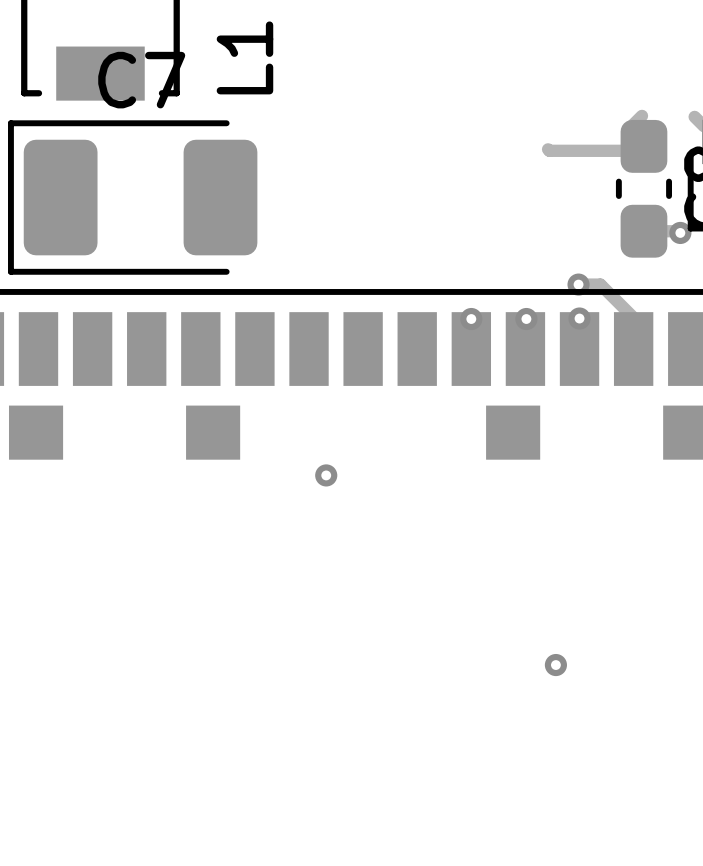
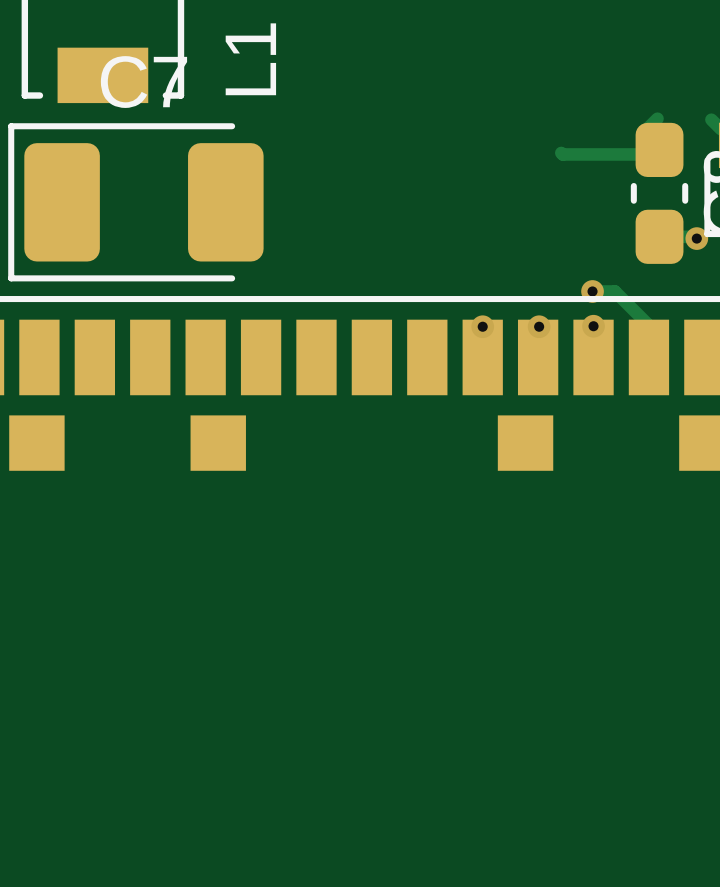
via: (326, 475) -> none
via: (555, 665) -> none

